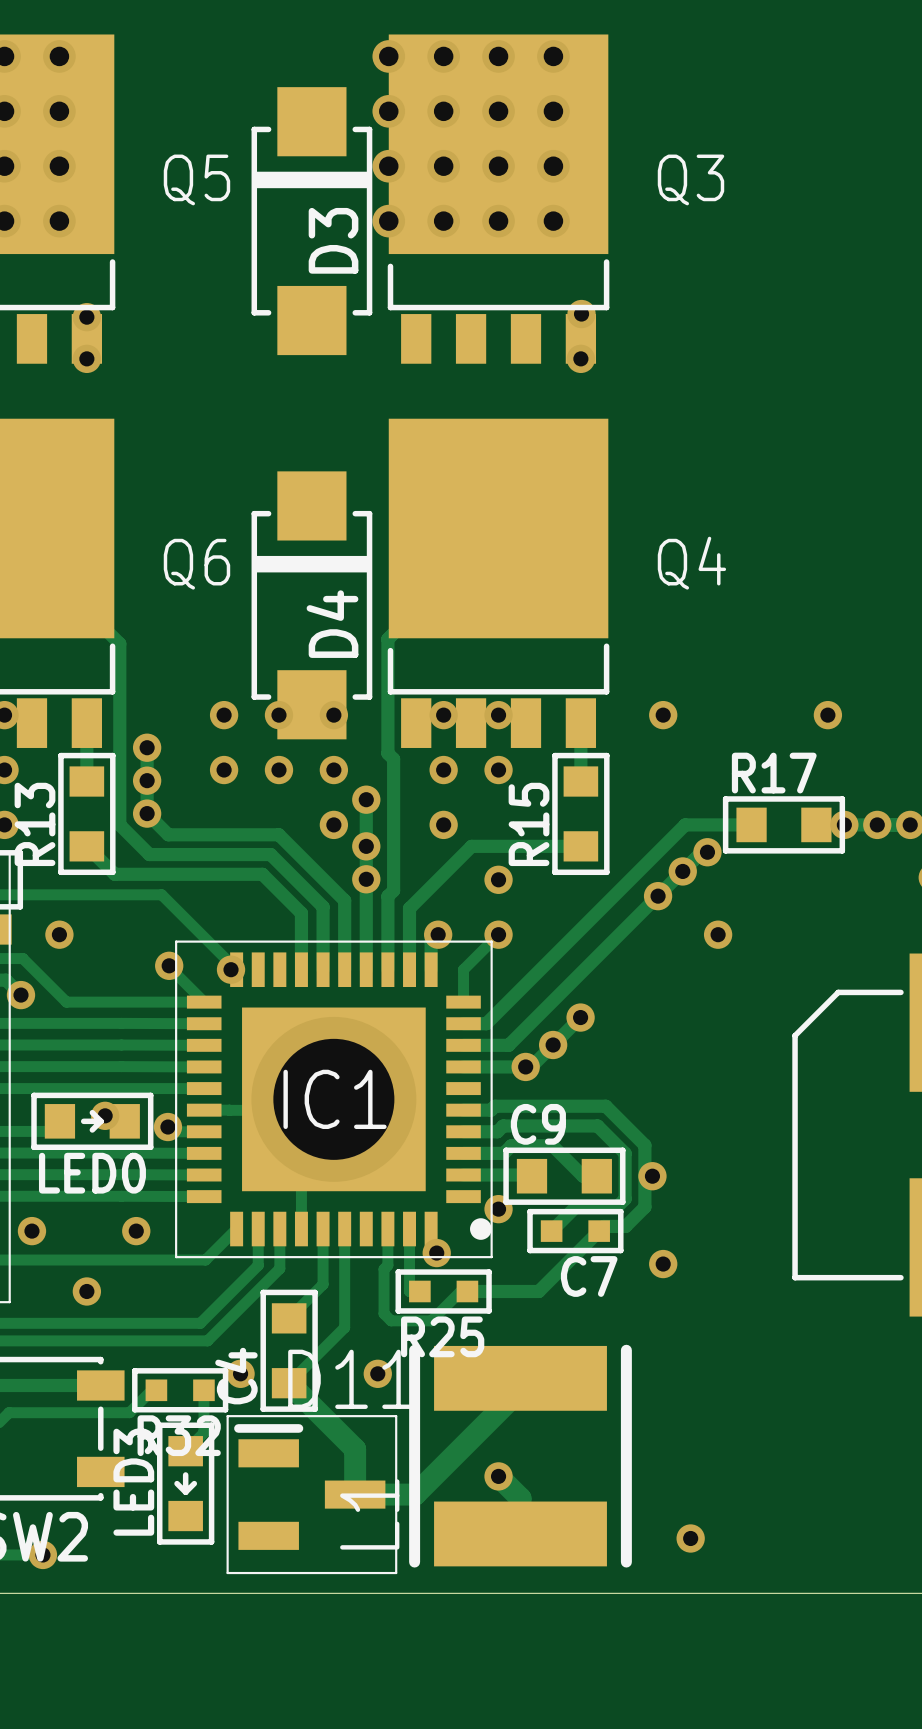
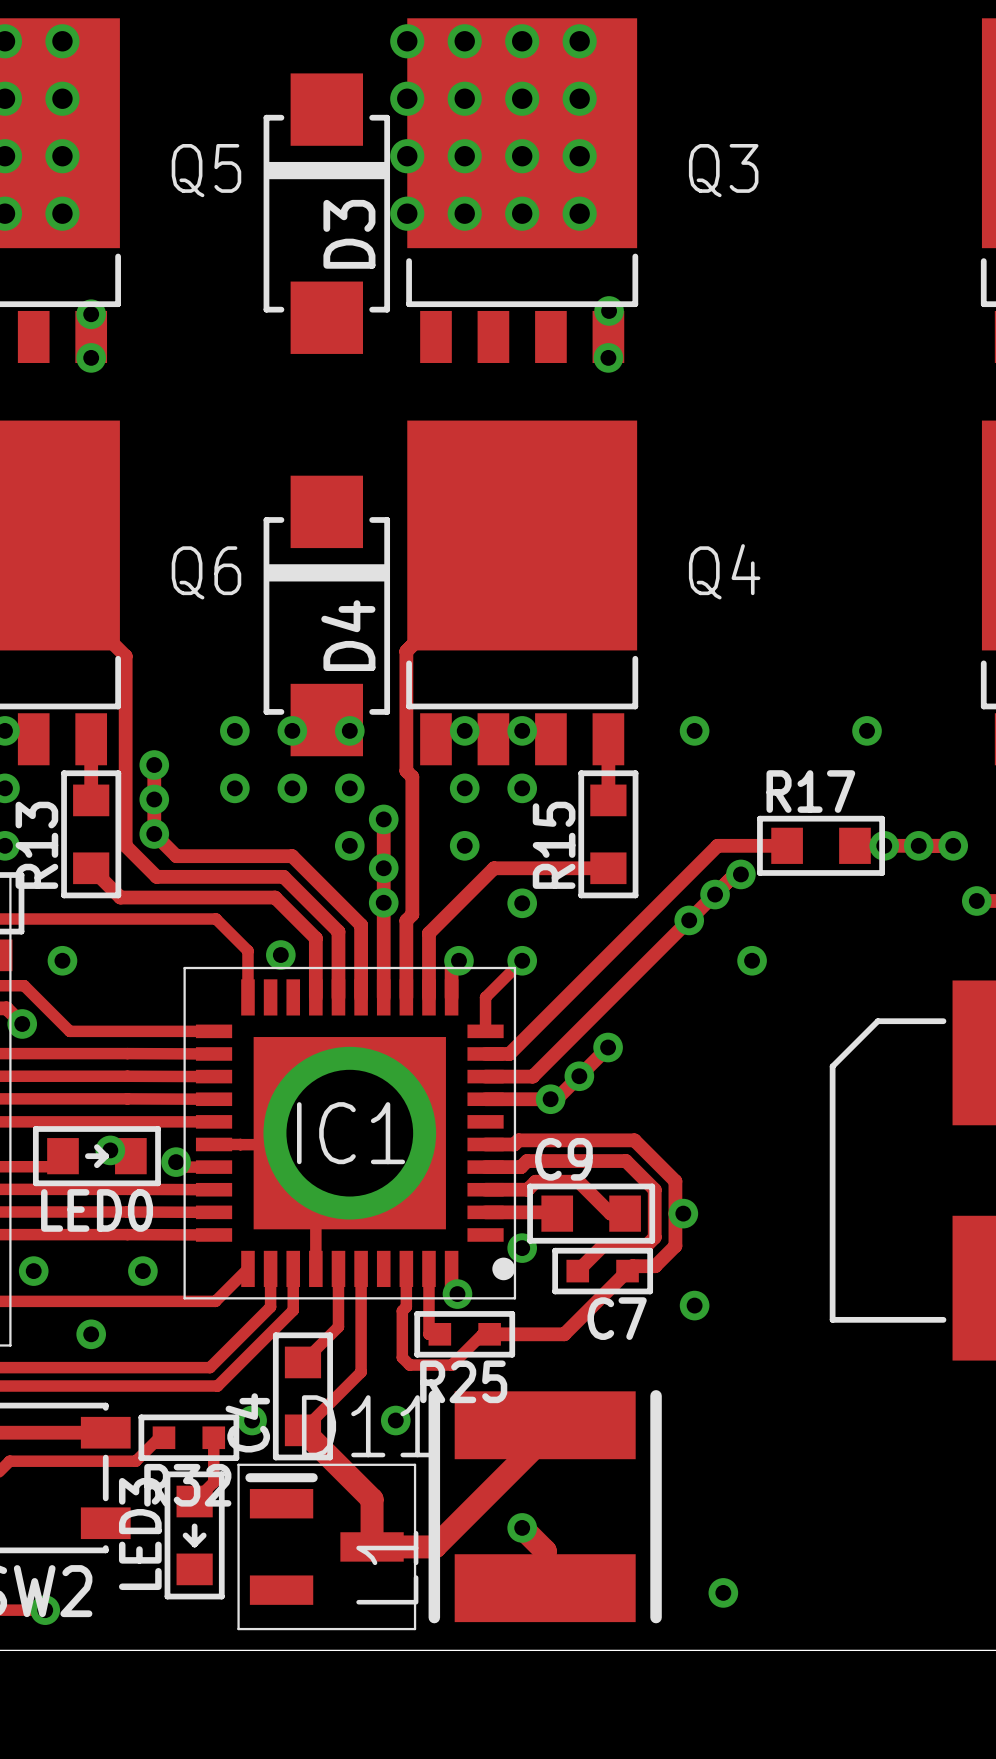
track: (161, 894) (236, 969) (231, 969) -> (169, 919) (216, 919) (247, 950) (247, 997)
via: none -> (280, 955)
track: (169, 965) (204, 1002) -> none
via: (169, 965) -> none
via: (231, 969) -> none

